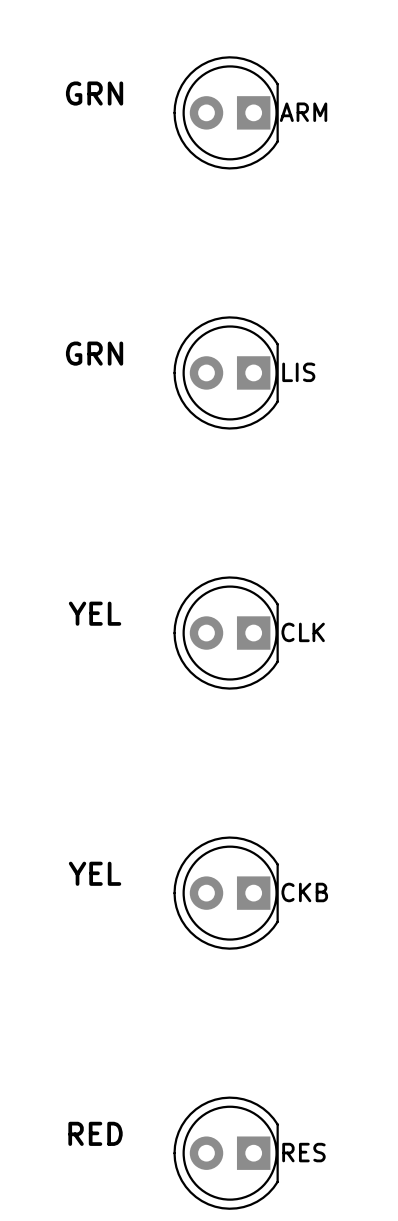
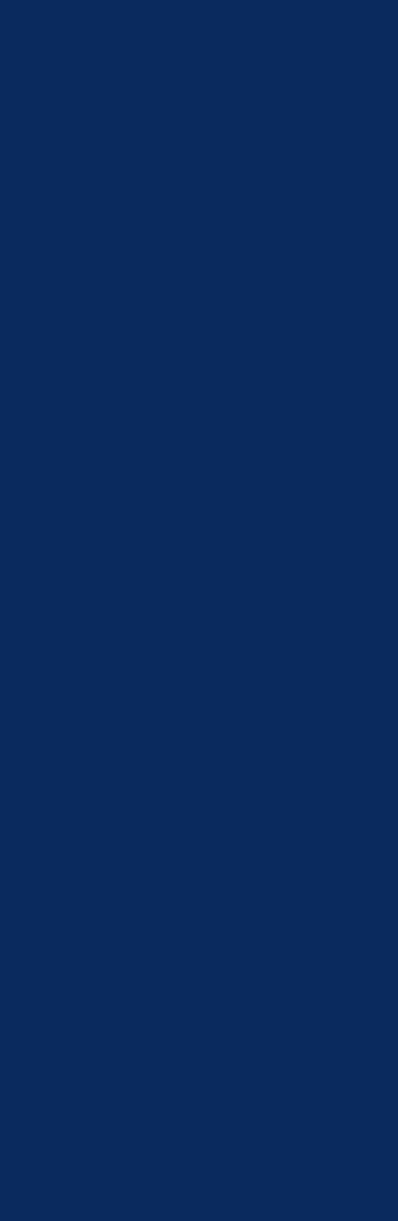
text: GRN (94, 93) -> none
part: ARM (226, 112) -> none
text: GRN (94, 353) -> none
part: LIS (226, 372) -> none
text: YEL (95, 613) -> none
part: CLK (226, 633) -> none
text: YEL (95, 873) -> none
part: CKB (226, 893) -> none
text: RED (95, 1133) -> none
part: RES (226, 1153) -> none

